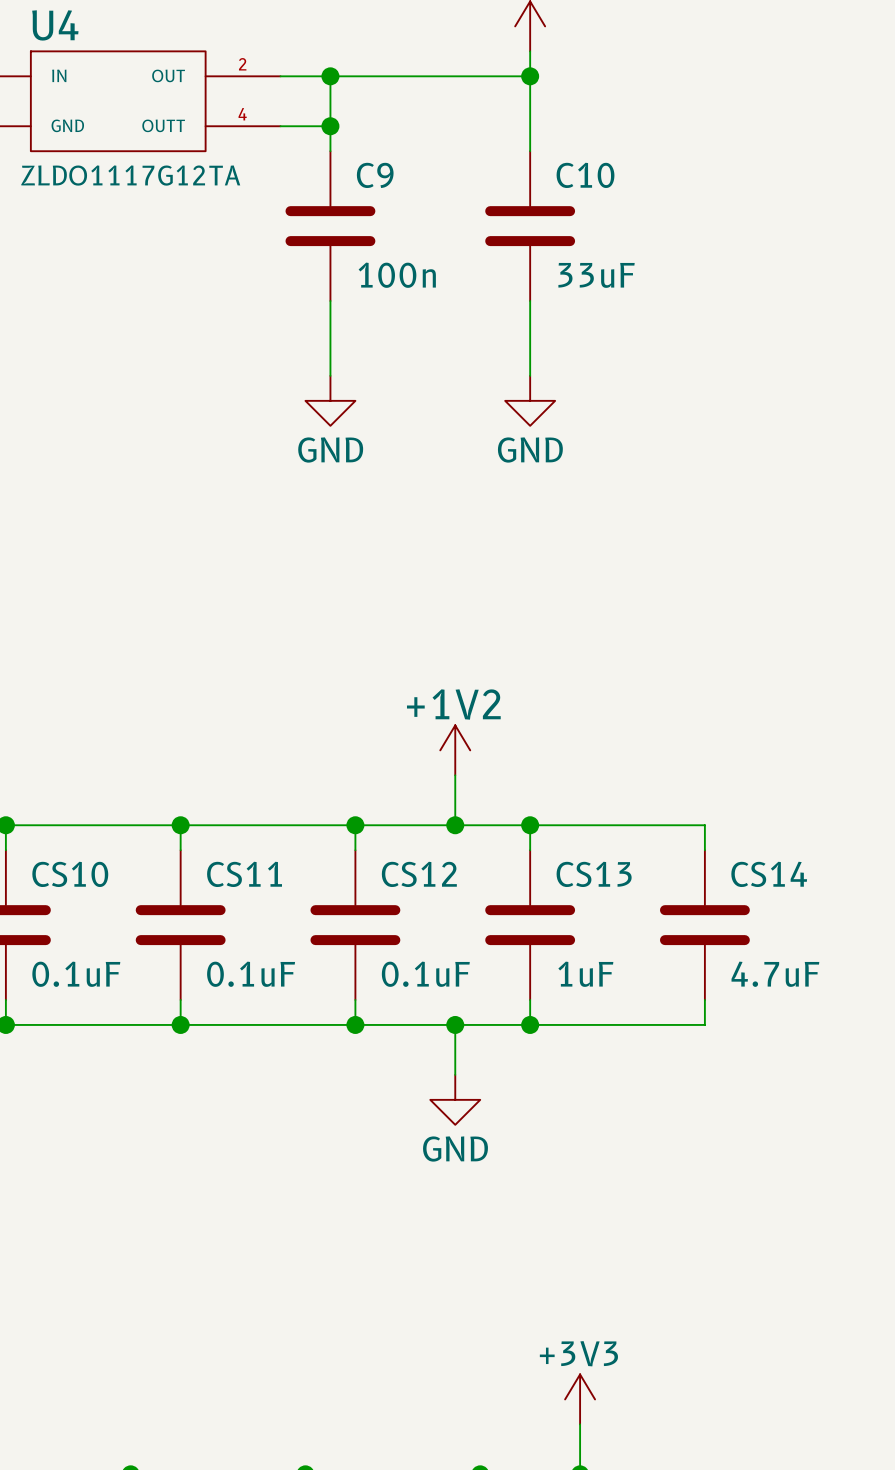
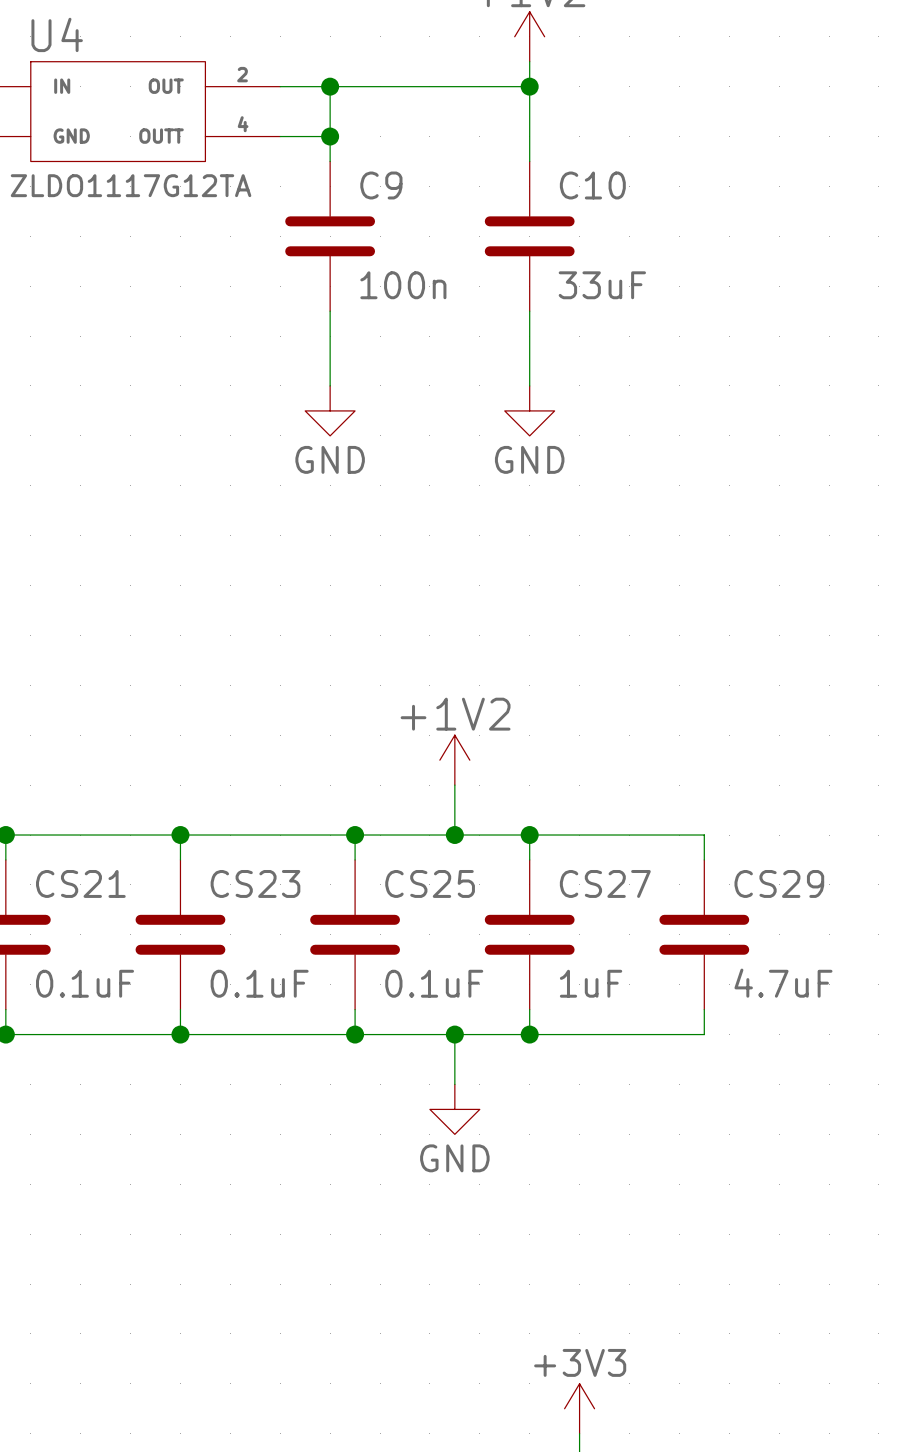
CS10 name: CS10 (70, 874) -> CS21 (80, 883)
CS11 name: CS11 (244, 874) -> CS23 (255, 883)
CS12 name: CS12 (419, 874) -> CS25 (430, 883)
CS13 name: CS13 (594, 874) -> CS27 (605, 883)
CS14 name: CS14 (769, 874) -> CS29 (779, 883)

